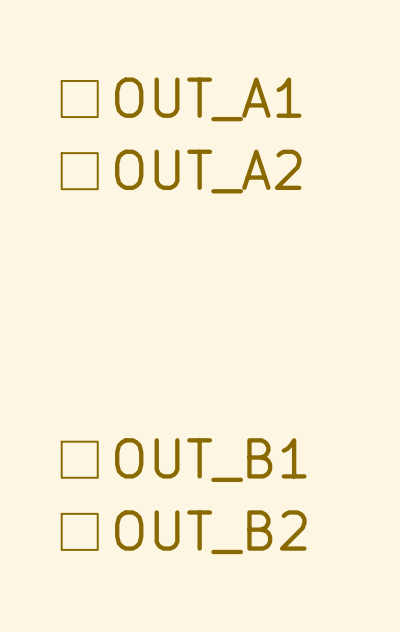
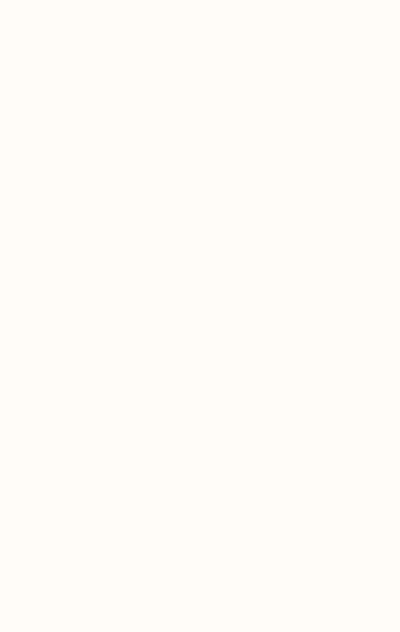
hierarchical label: OUT_A1 (208, 99) -> none
hierarchical label: OUT_A2 (208, 171) -> none
hierarchical label: OUT_B1 (210, 460) -> none
hierarchical label: OUT_B2 (210, 532) -> none

